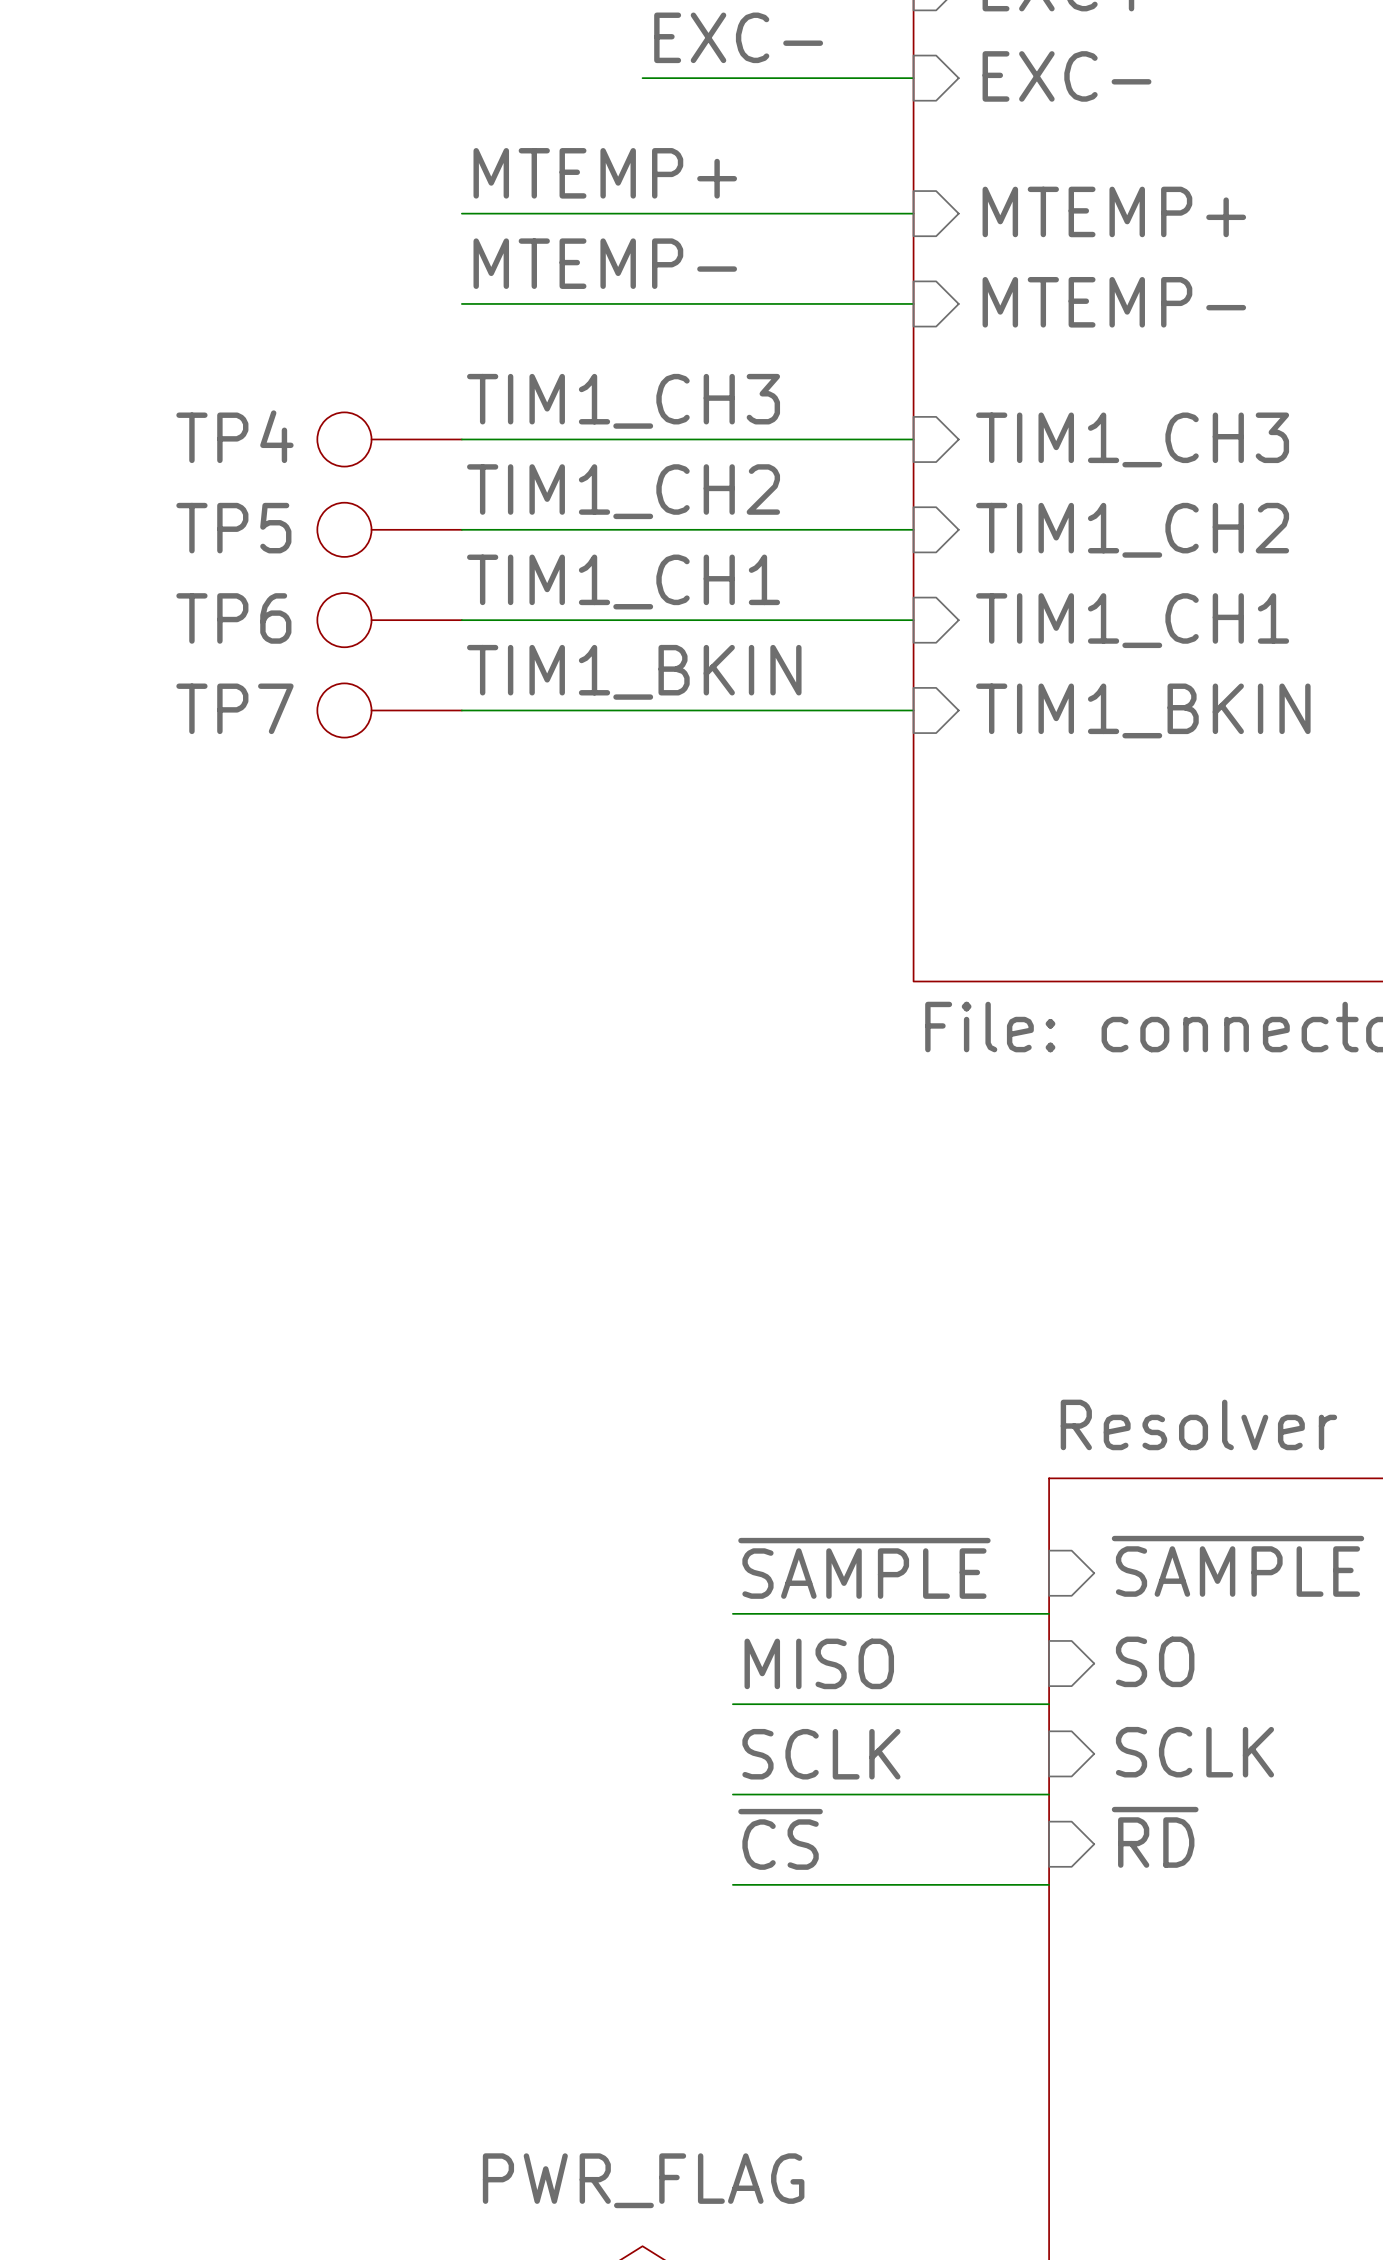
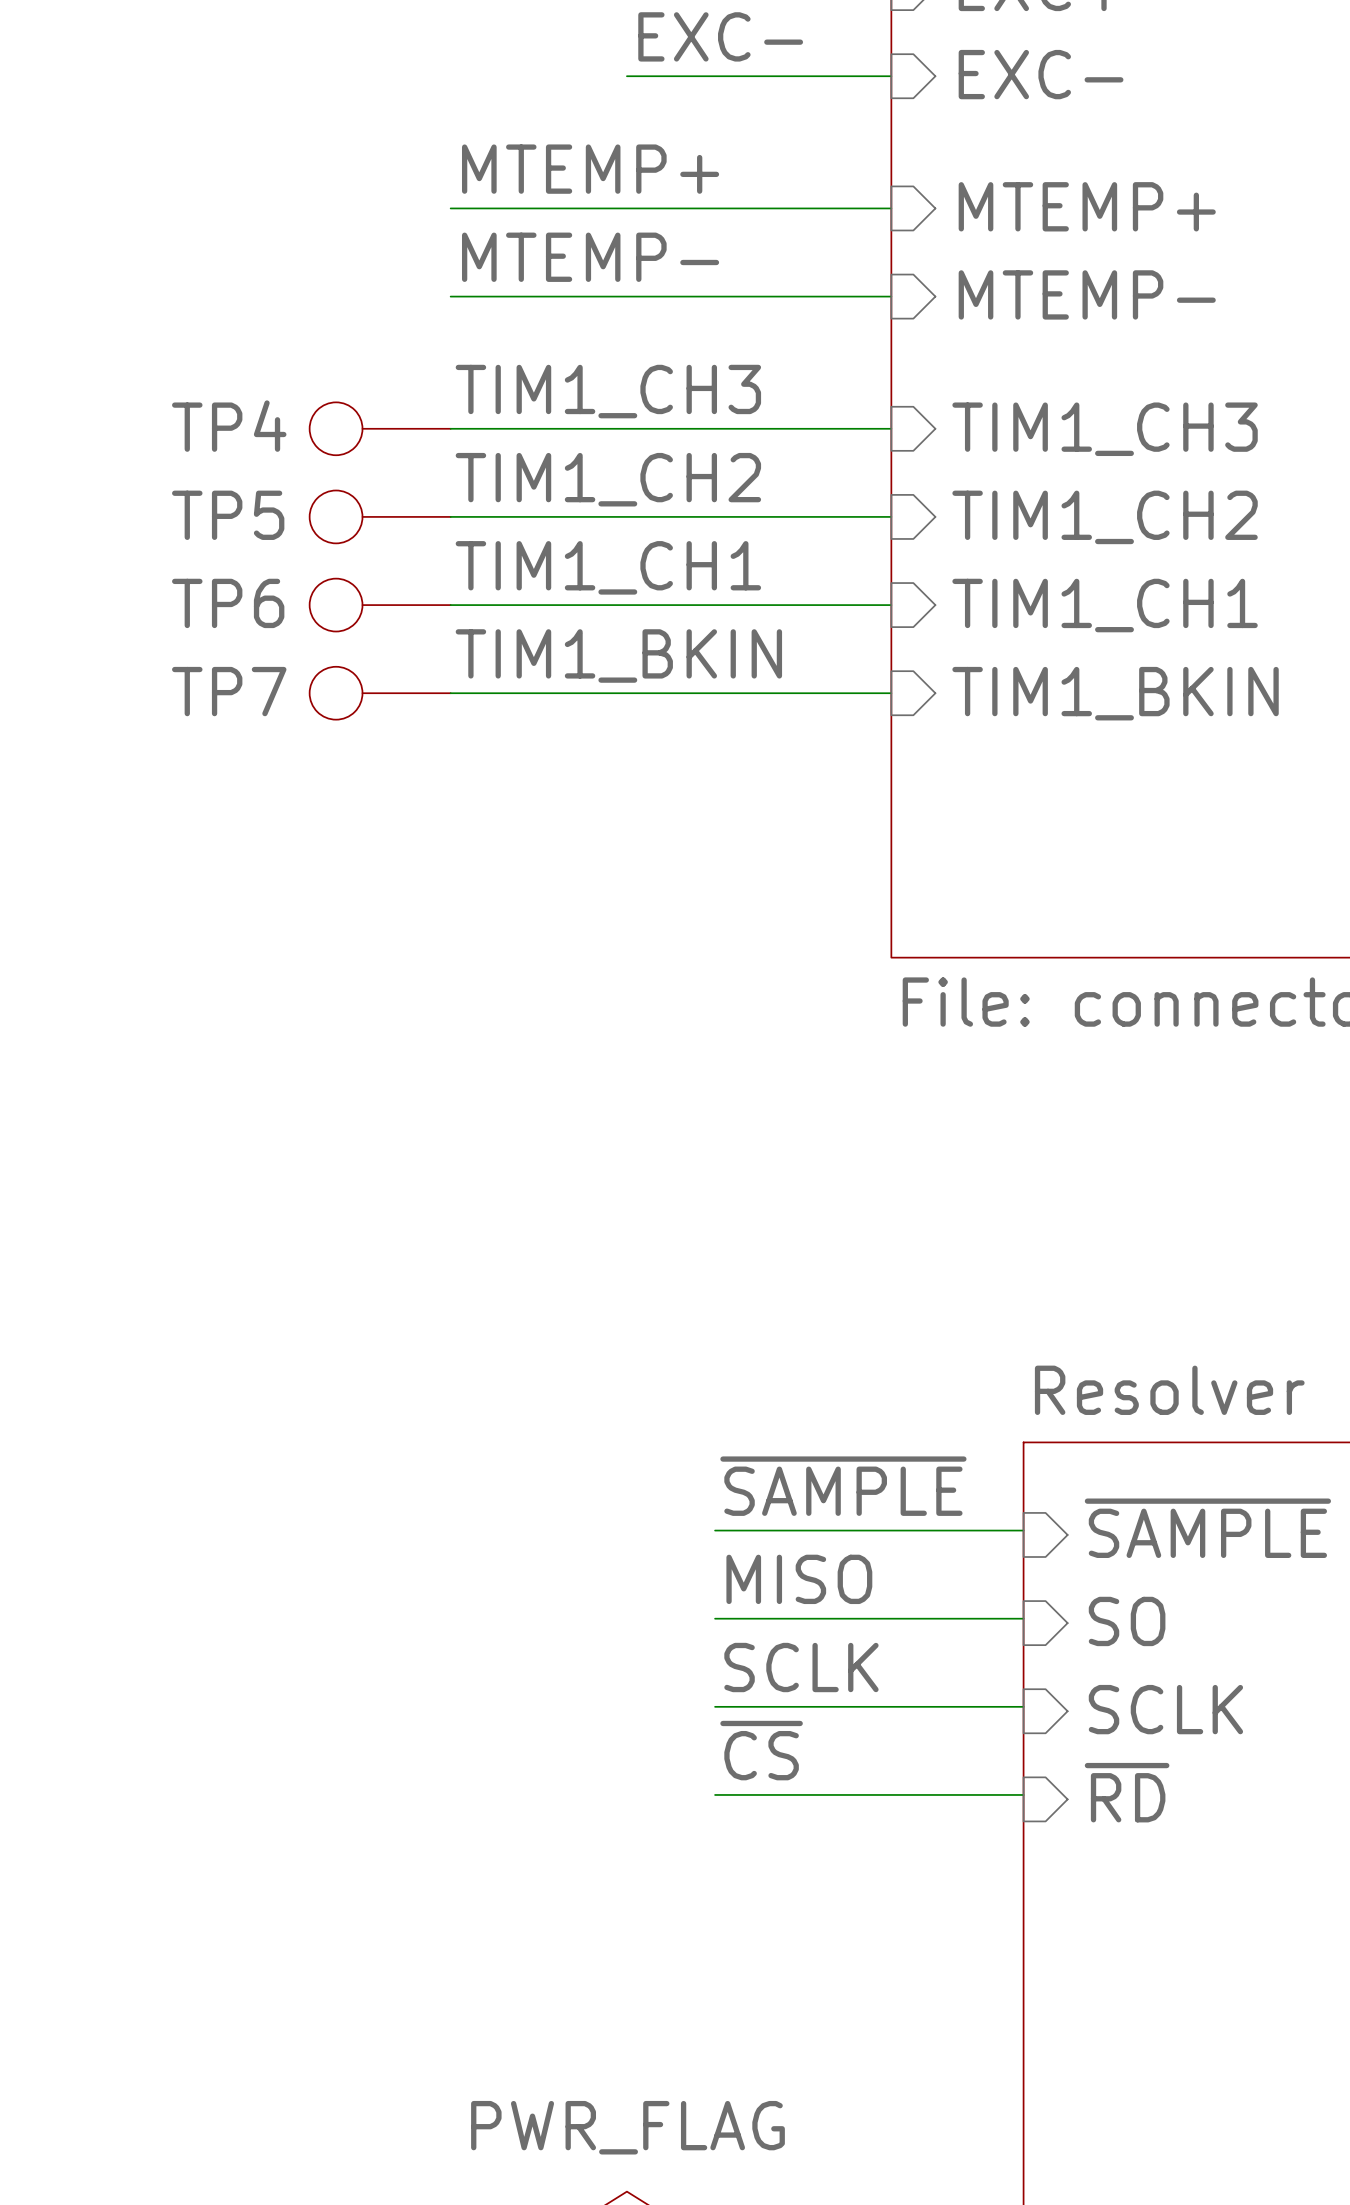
label position: ~{SAMPLE} (864, 1568) -> ~{SAMPLE} (843, 1486)
wire: (732, 1613) (1049, 1613) -> (715, 1530) (1023, 1530)
label position: MISO (819, 1663) -> MISO (799, 1579)
wire: (732, 1704) (1049, 1704) -> (715, 1618) (1023, 1618)
label position: SCLK (821, 1754) -> SCLK (801, 1667)
wire: (732, 1794) (1049, 1794) -> (715, 1706) (1023, 1706)
label position: ~{CS} (780, 1839) -> ~{CS} (761, 1750)
wire: (732, 1884) (1049, 1884) -> (715, 1794) (1023, 1794)

